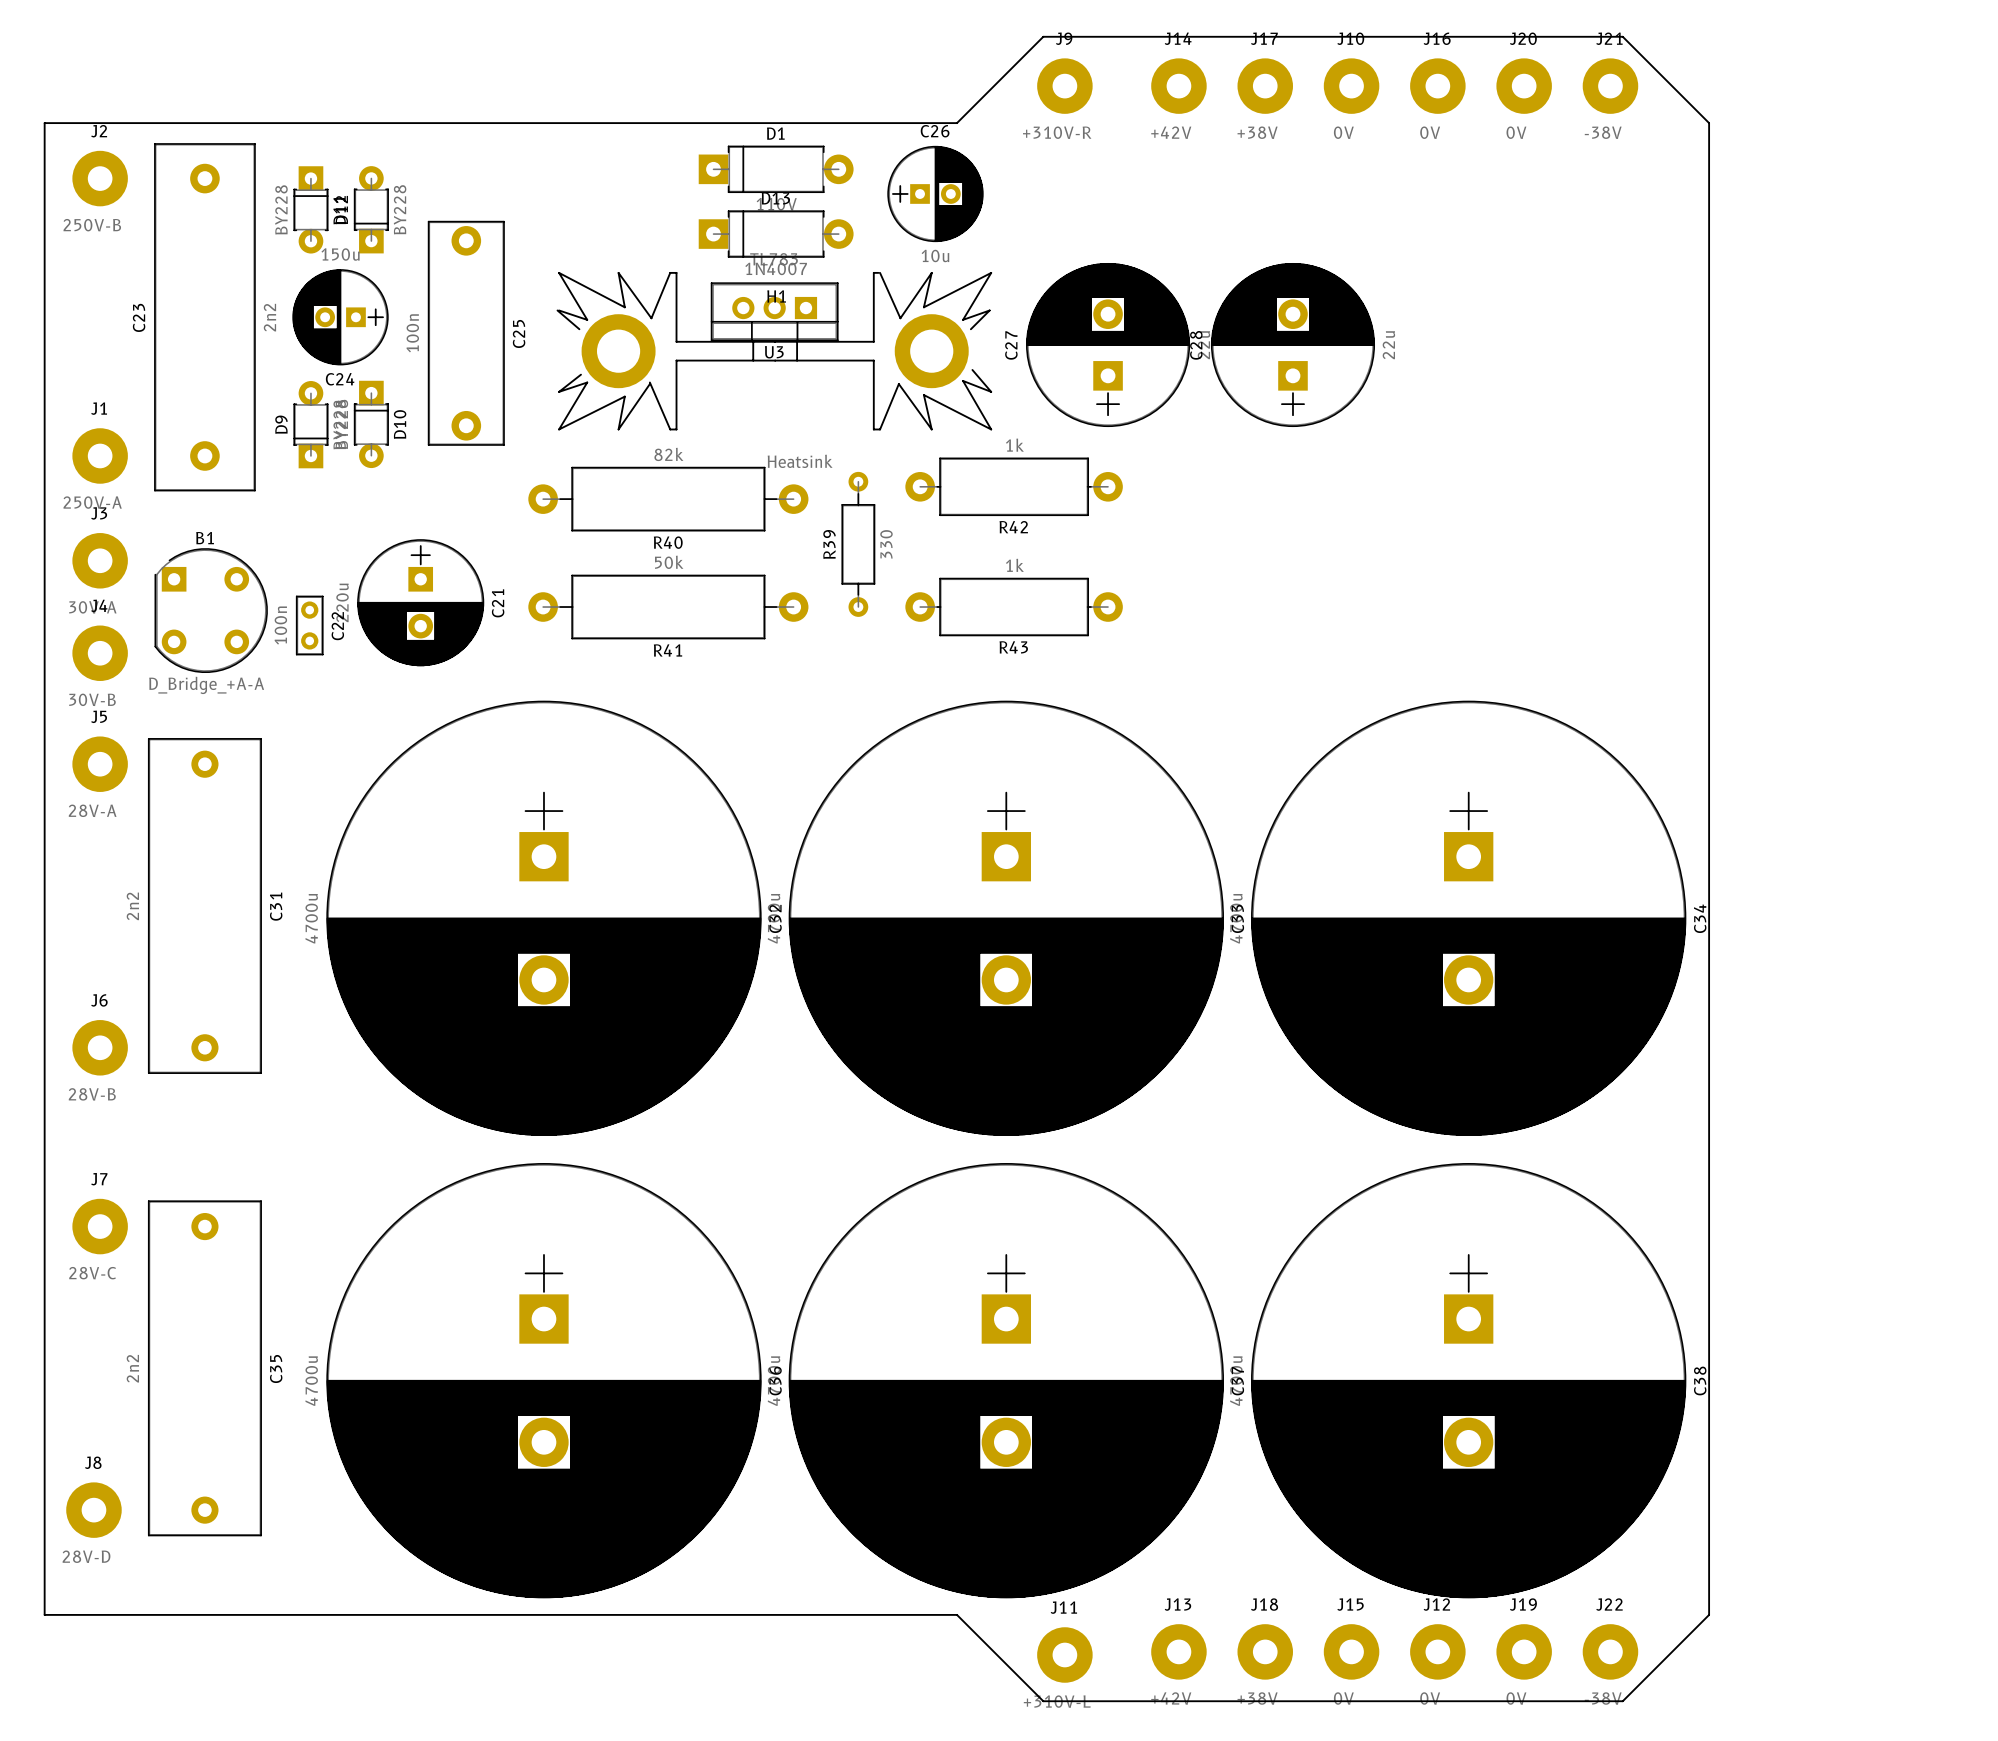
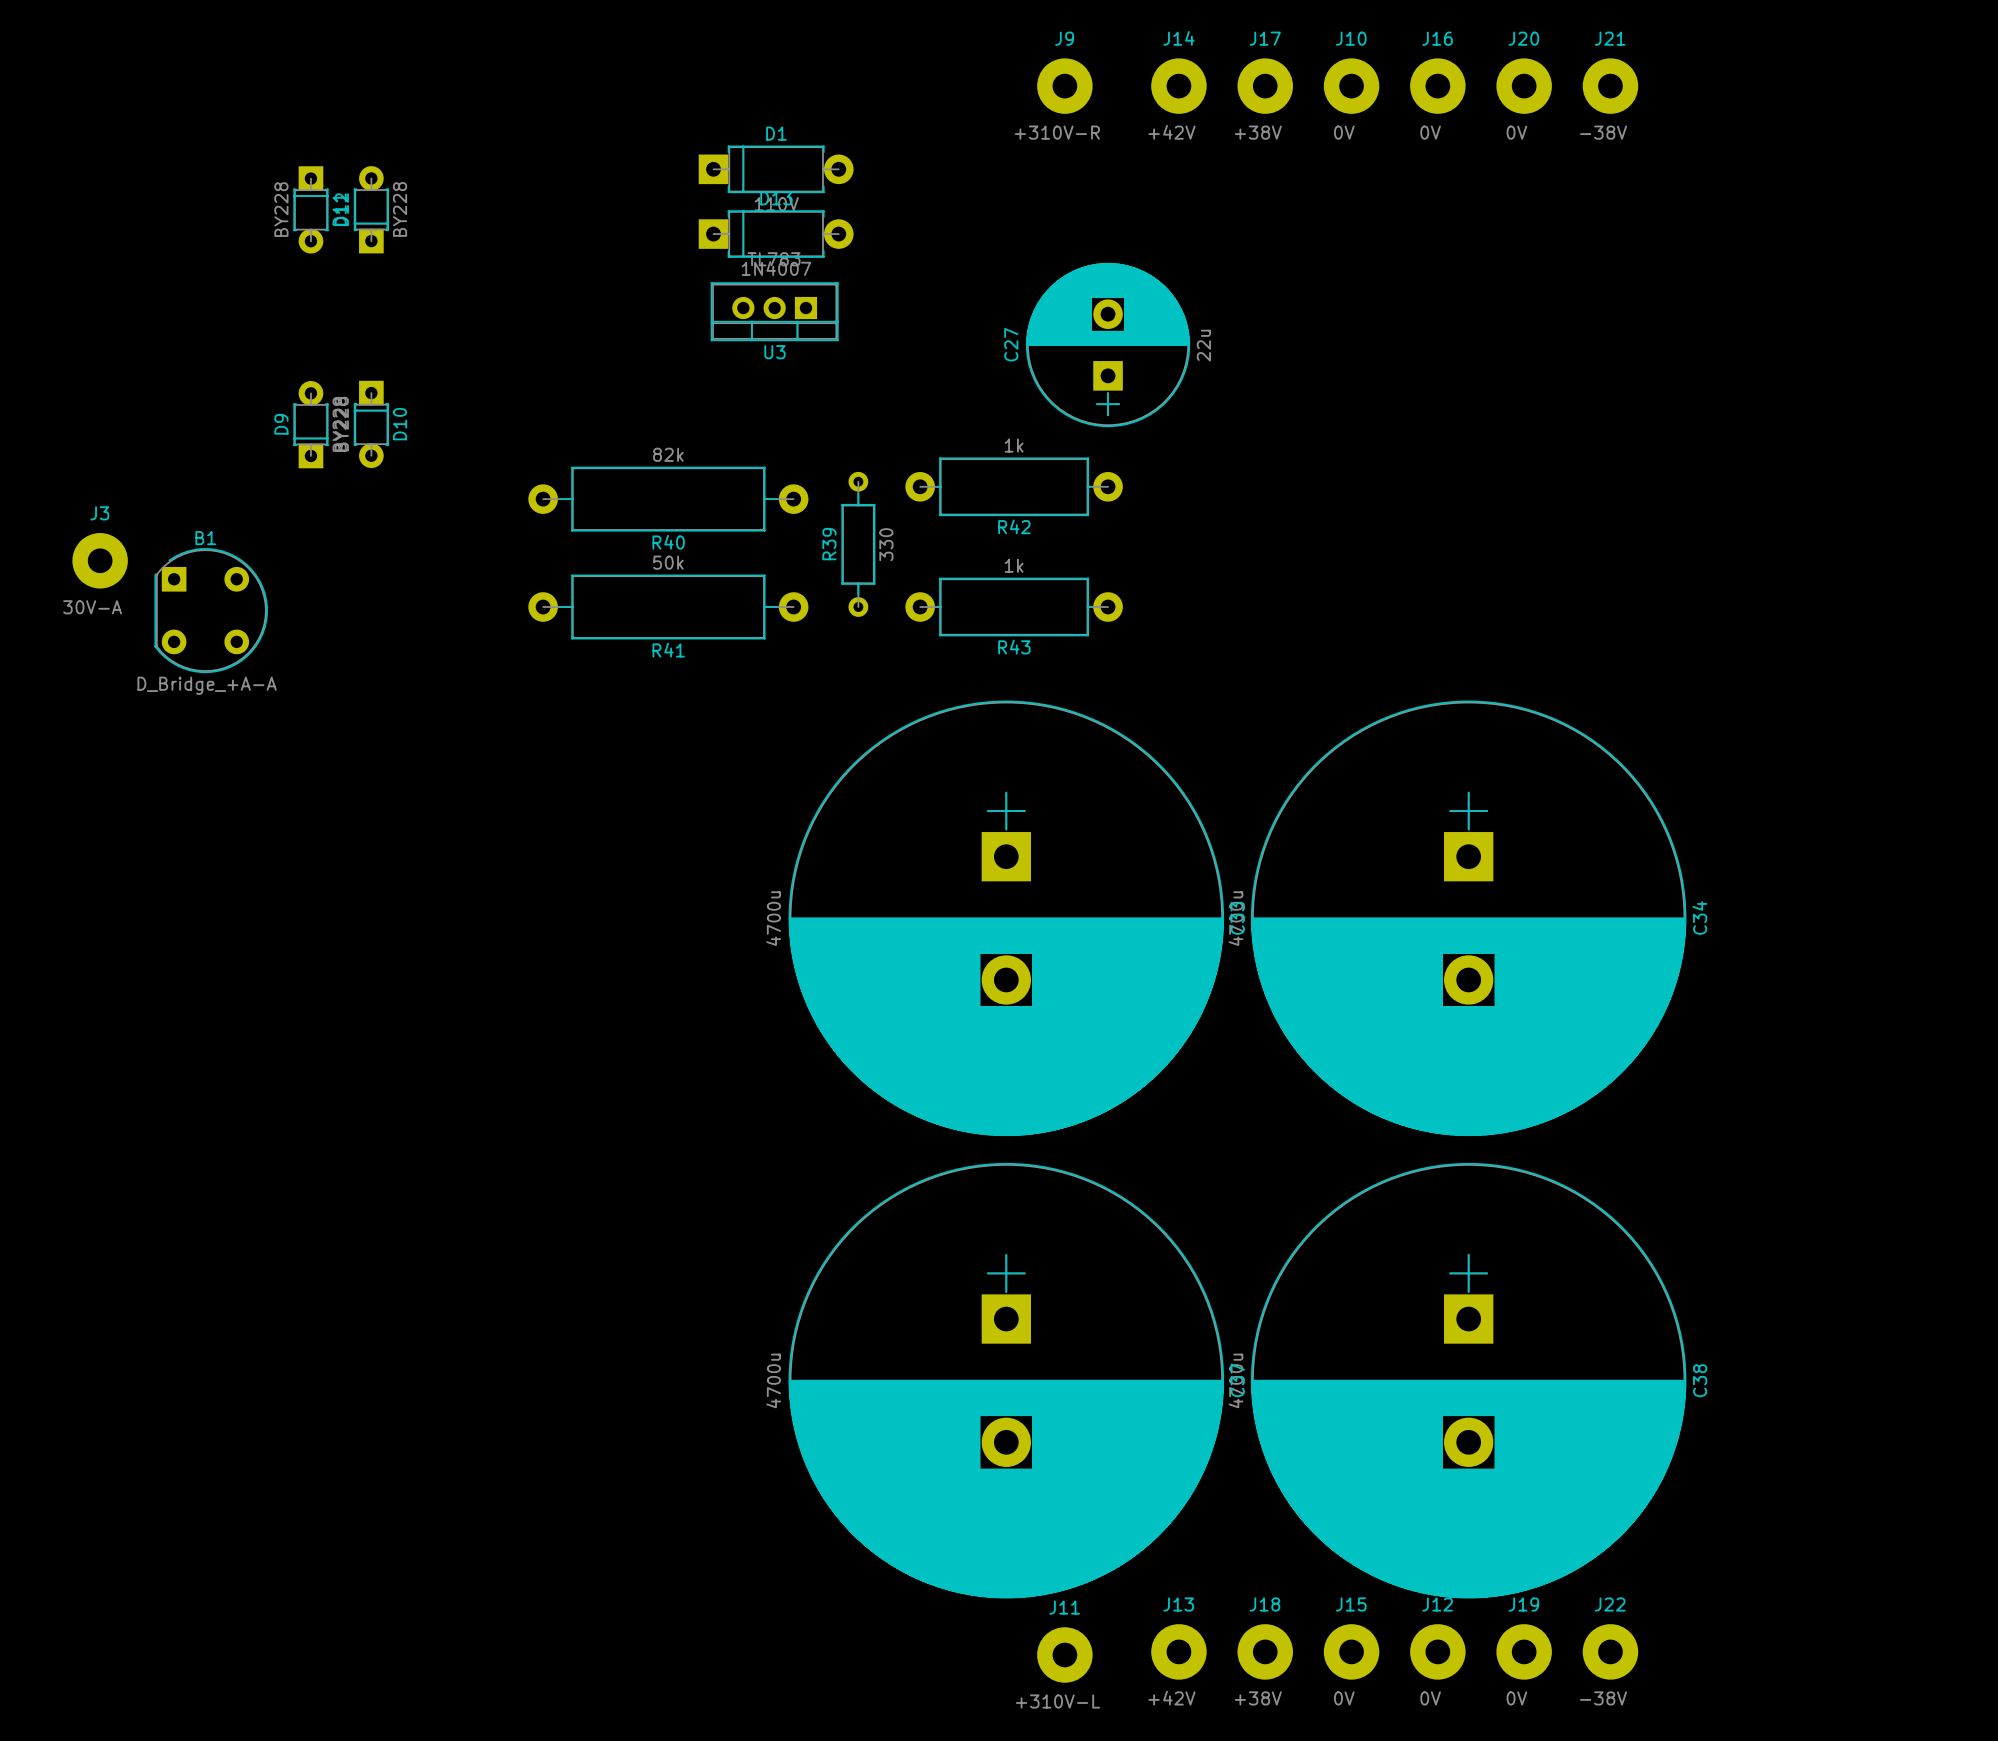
board edge: (1043, 36) (957, 123) (44, 123) (44, 1614) (957, 1614) (1043, 1701) (1622, 1701) (1709, 1614) (1709, 123) (1622, 36) (1043, 36) -> none
J2: 250V-B (100, 178) -> none
C26: 10u (935, 193) -> none
C23: 2n2 (204, 317) -> none
C24: 150u (340, 317) -> none
C25: 100n (466, 333) -> none
C28: 22u (1292, 345) -> none
H1: Heatsink (774, 351) -> none
J1: 250V-A (100, 455) -> none
C21: 220u (420, 602) -> none
C22: 100n (309, 625) -> none
J4: 30V-B (100, 653) -> none
J5: 28V-A (100, 764) -> none
C31: 2n2 (204, 906) -> none
C32: 4700u (543, 918) -> none
J6: 28V-B (100, 1047) -> none
J7: 28V-C (100, 1226) -> none
C35: 2n2 (204, 1368) -> none
C36: 4700u (543, 1380) -> none
J8: 28V-D (93, 1510) -> none

